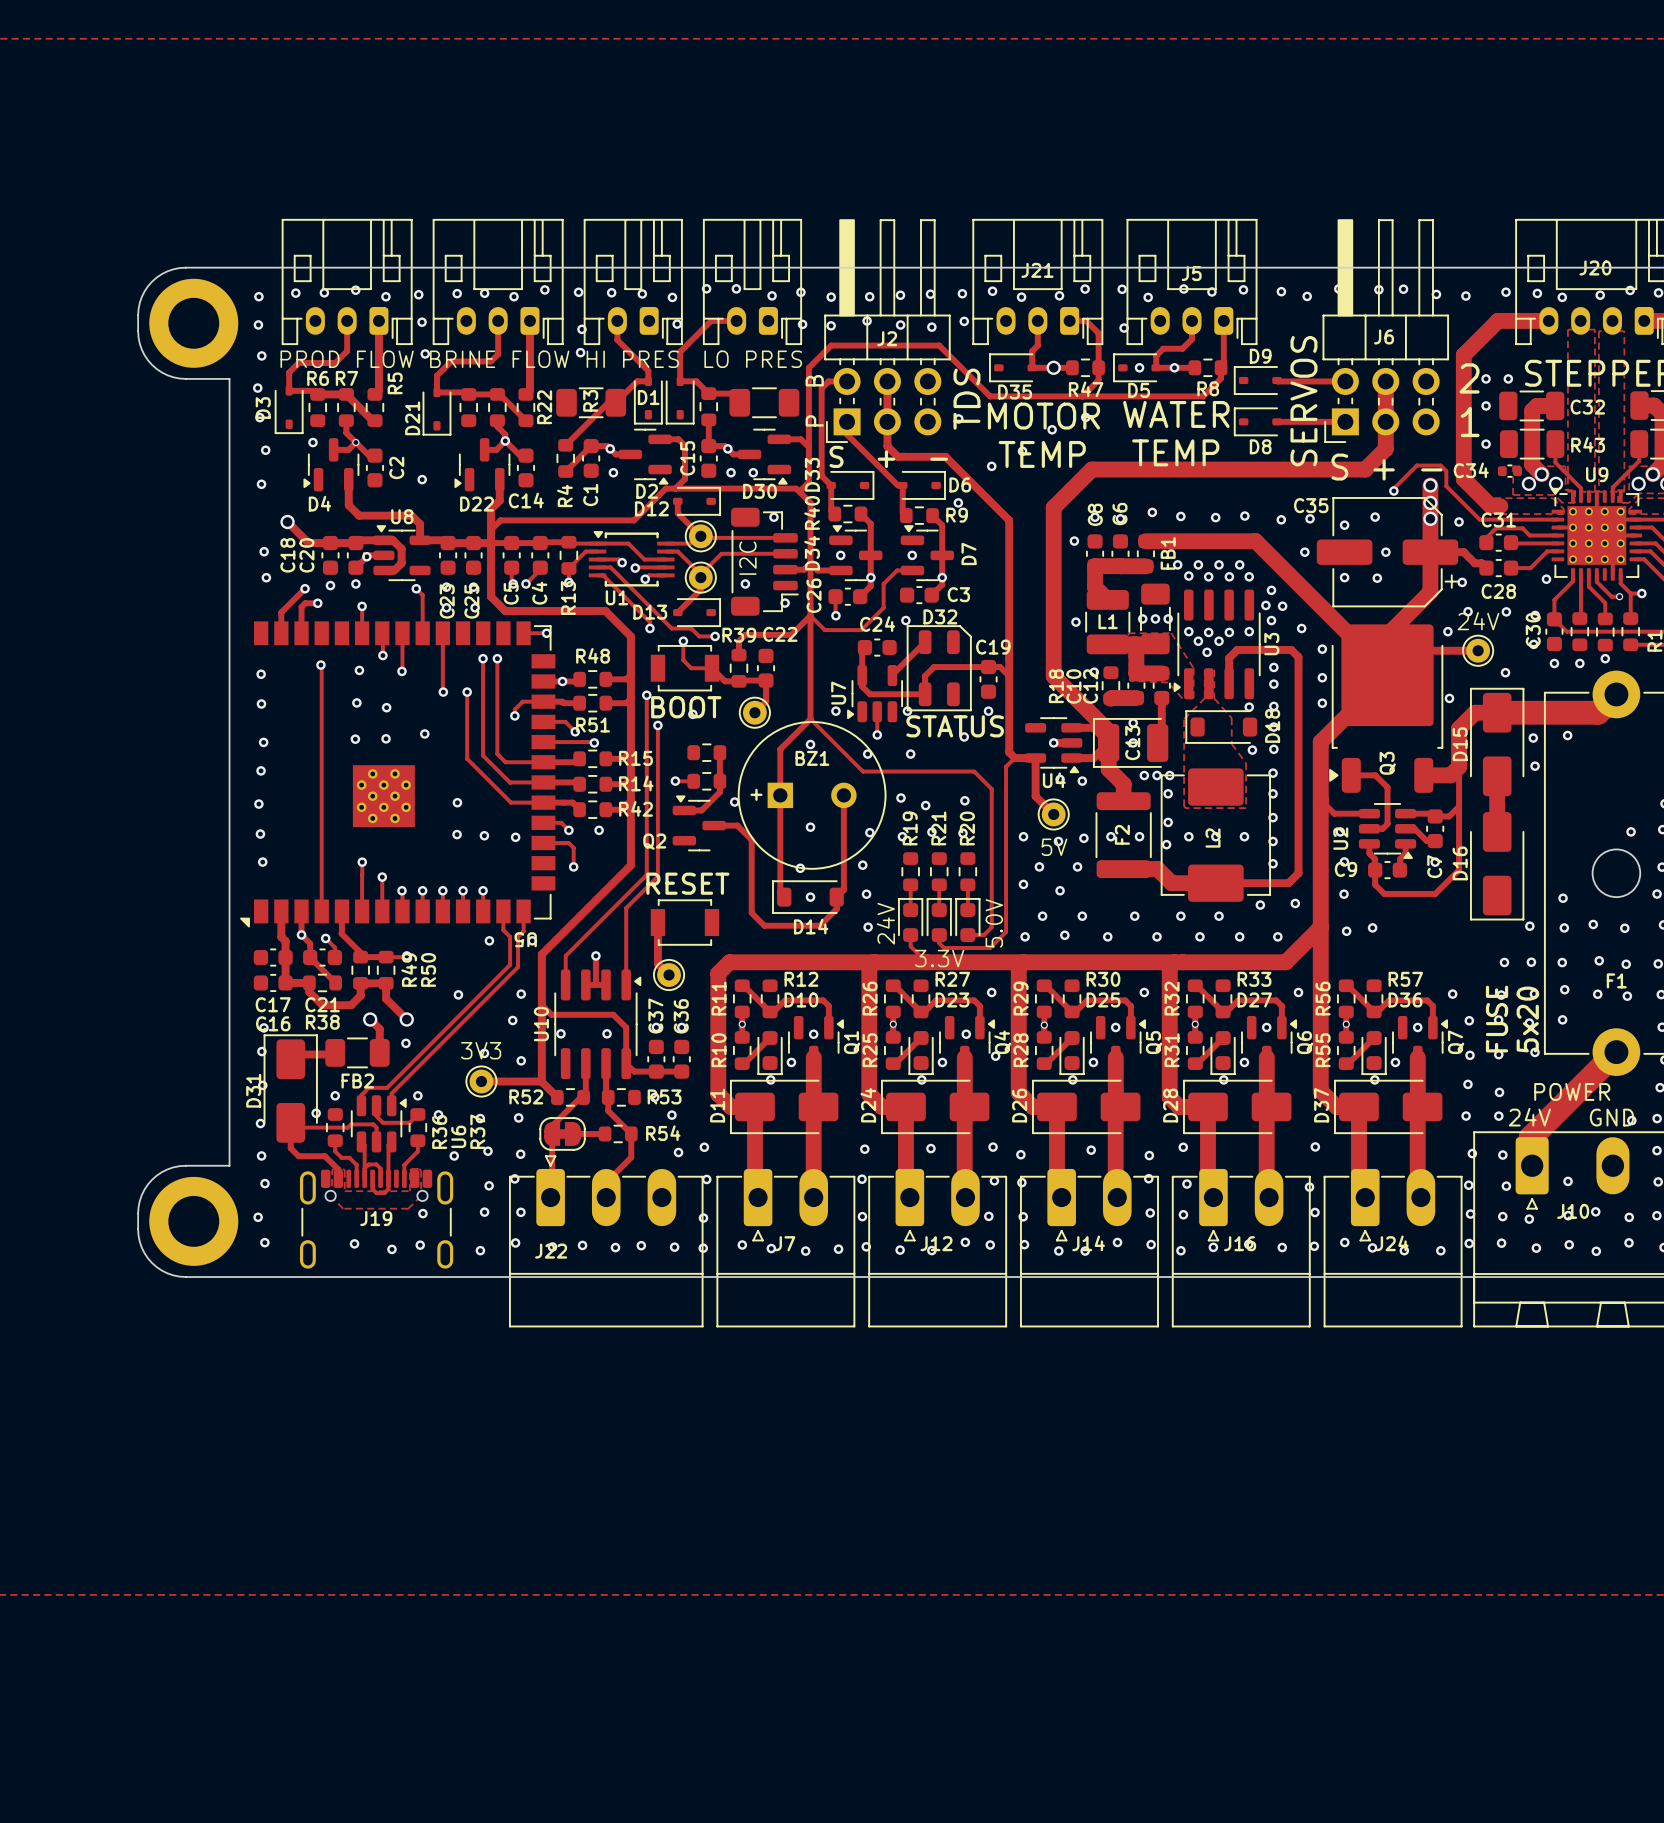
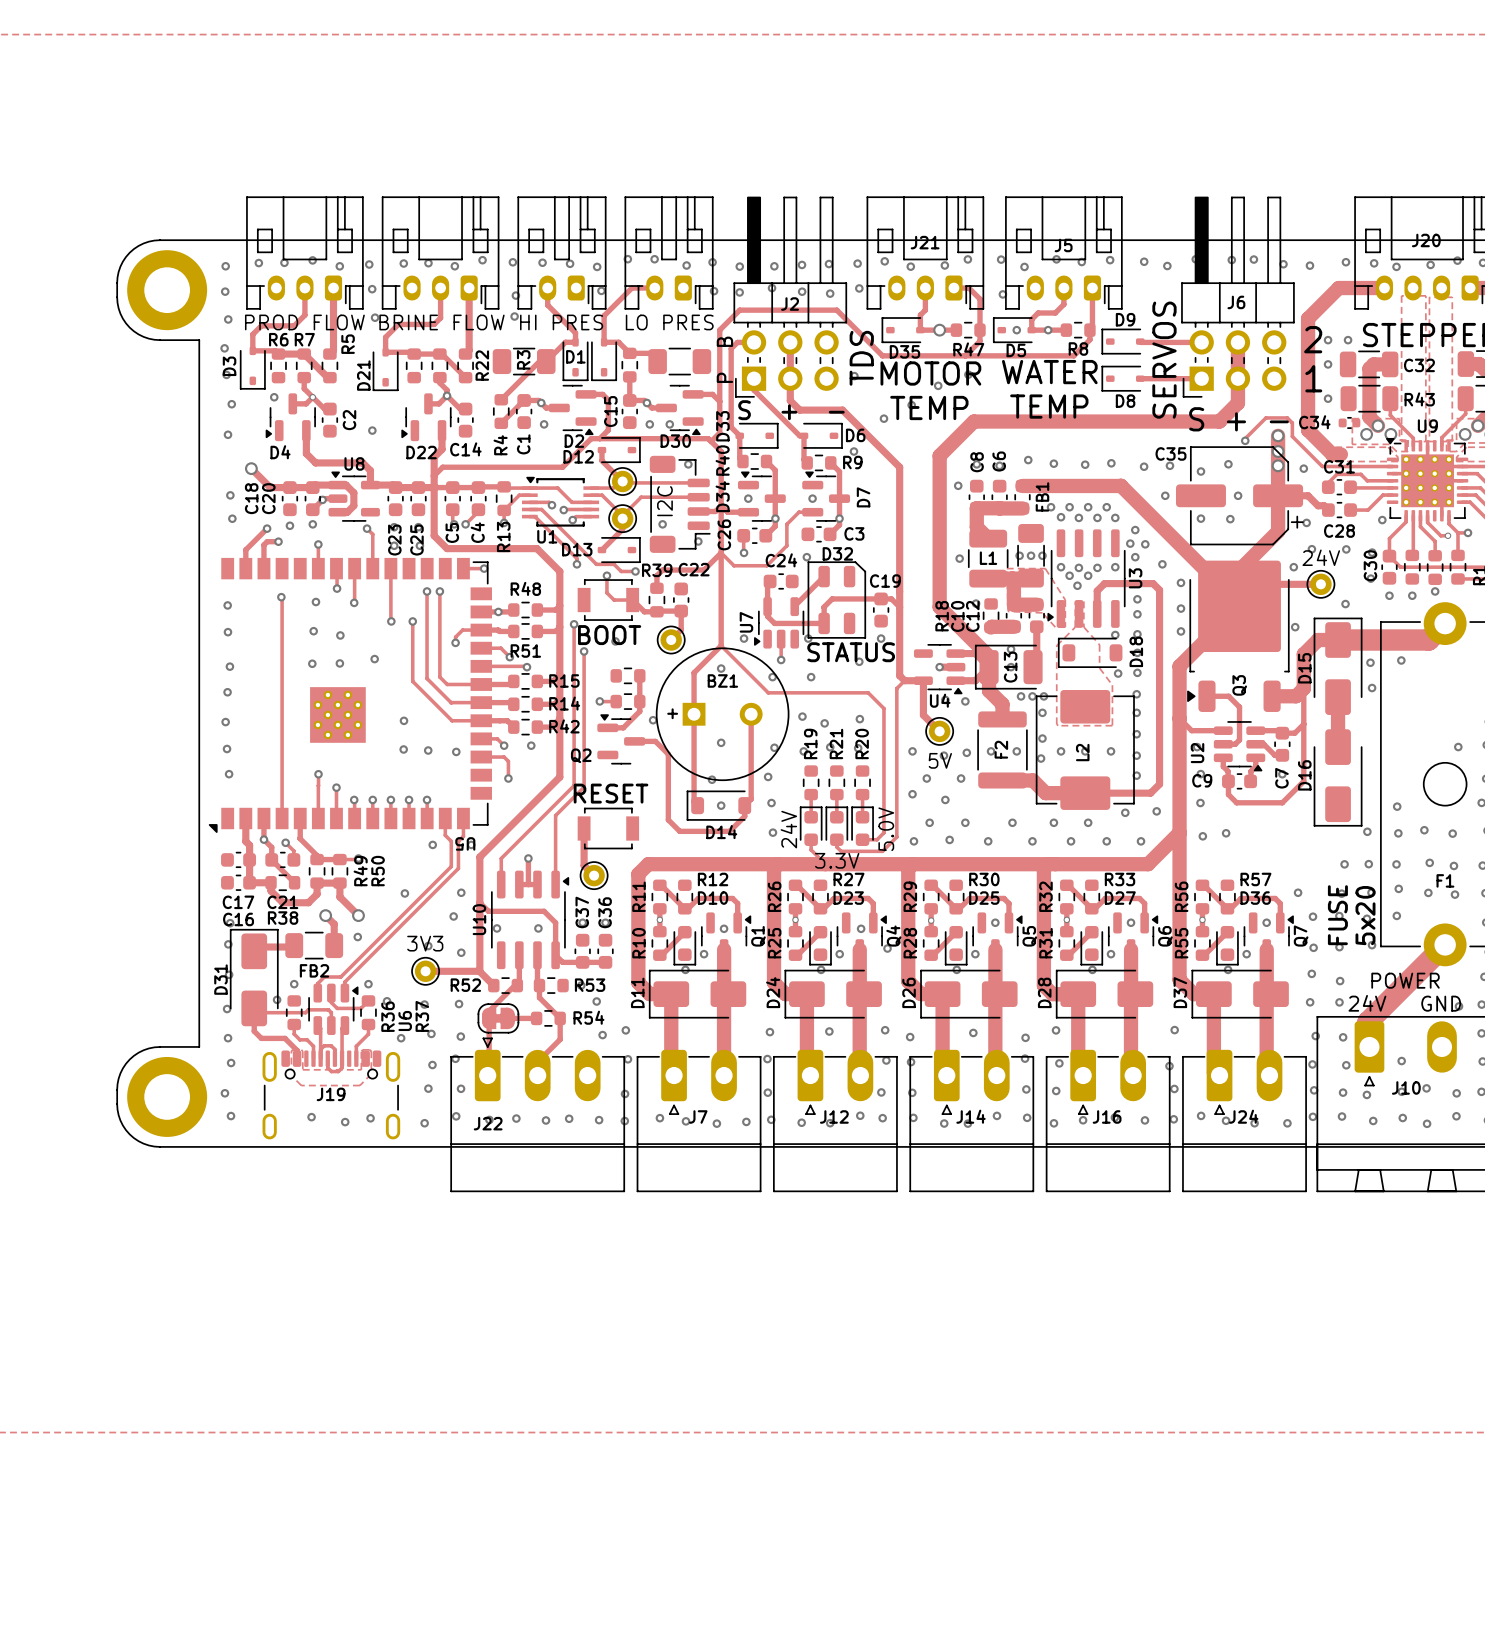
via: (991, 992) -> none
via: (1144, 992) -> none
via: (1298, 992) -> none
via: (422, 1213) -> none

